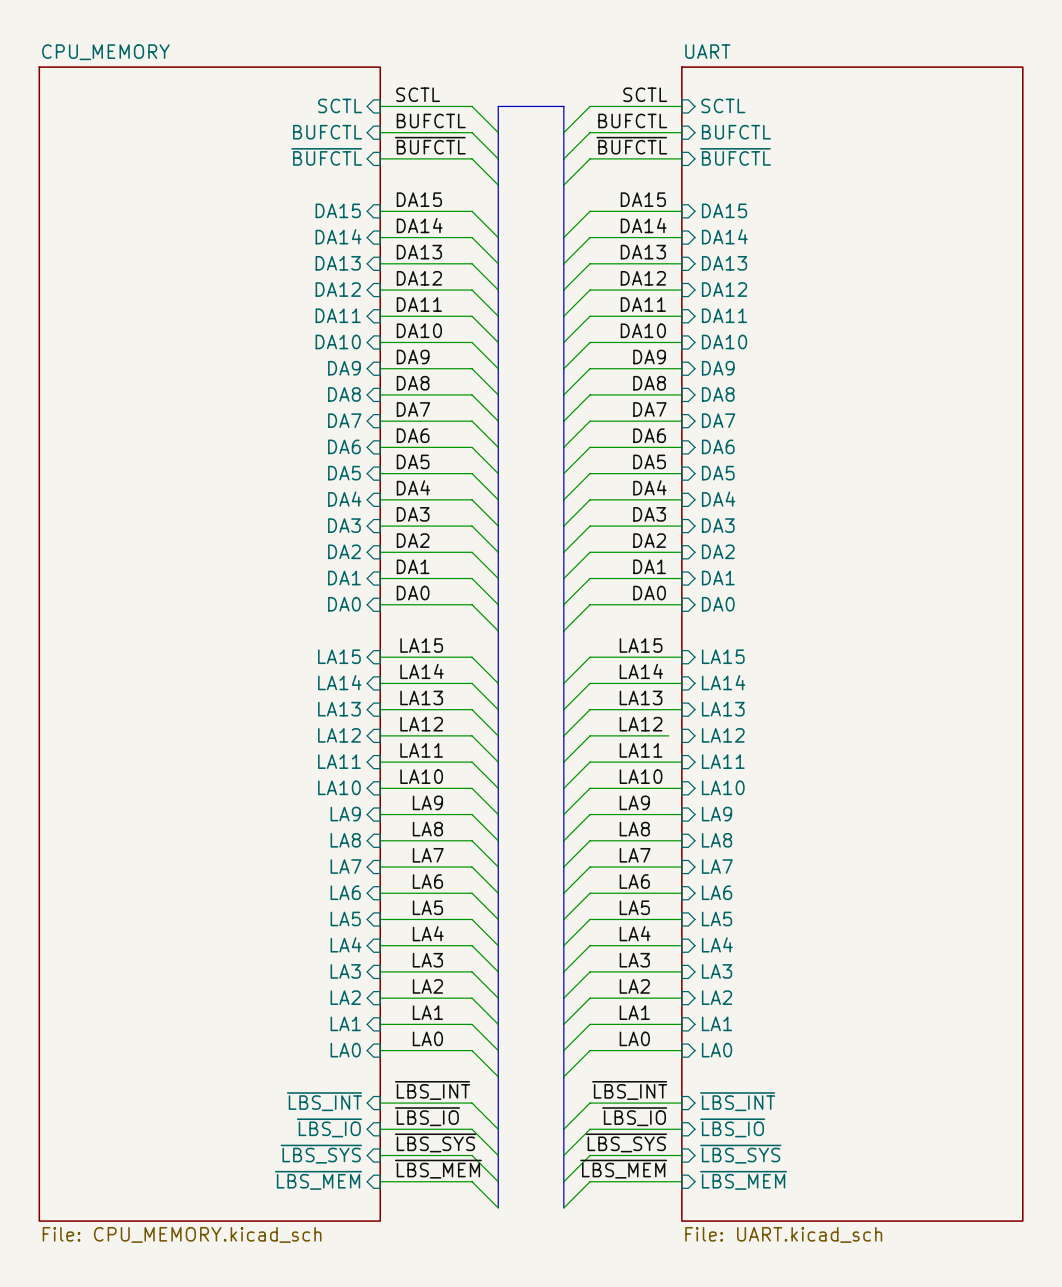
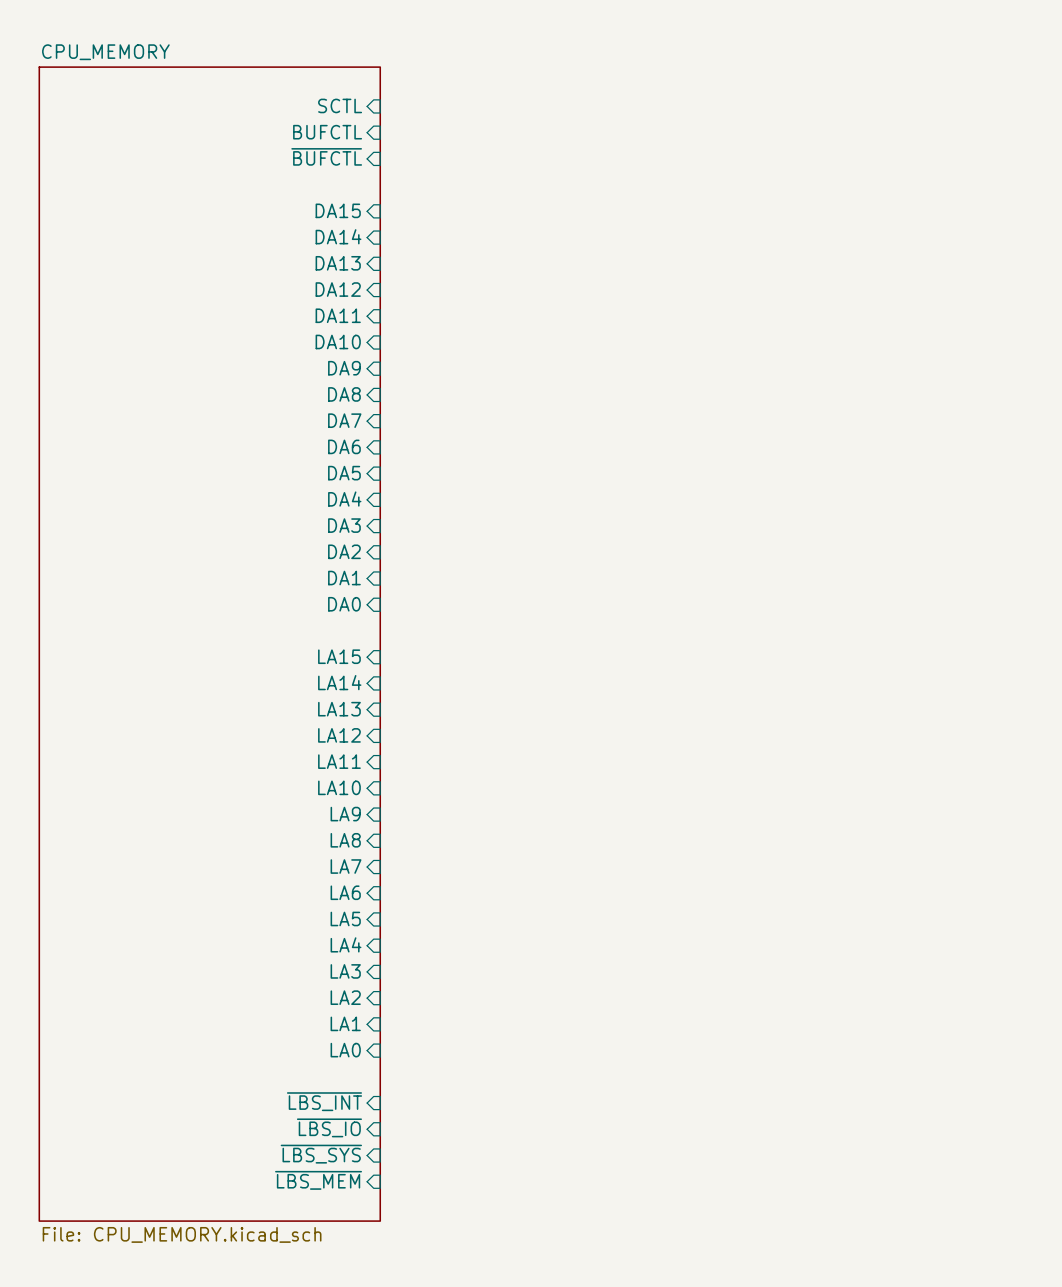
label: SCTL (418, 94) -> none
label: SCTL (645, 94) -> none
sheet pin: SCTL (723, 105) -> none
wire: (380, 106) (472, 106) (498, 132) -> none
wire: (681, 106) (590, 106) (563, 132) -> none
label: BUFCTL (431, 120) -> none
label: BUFCTL (632, 120) -> none
wire: (380, 132) (472, 132) (498, 158) -> none
wire: (681, 132) (590, 132) (563, 158) -> none
sheet pin: BUFCTL (736, 132) -> none
label: ~{BUFCTL} (430, 145) -> none
label: ~{BUFCTL} (631, 145) -> none
sheet pin: ~{BUFCTL} (735, 156) -> none
wire: (380, 158) (472, 158) (498, 185) -> none
wire: (681, 158) (590, 158) (563, 185) -> none
label: DA15 (419, 199) -> none
label: DA15 (643, 199) -> none
sheet pin: DA15 (724, 210) -> none
wire: (380, 211) (472, 211) (498, 237) -> none
wire: (681, 211) (590, 211) (563, 237) -> none
label: DA14 (419, 225) -> none
label: DA14 (643, 225) -> none
sheet pin: DA14 (724, 236) -> none
wire: (380, 237) (472, 237) (498, 263) -> none
wire: (681, 237) (590, 237) (563, 263) -> none
label: DA13 (419, 252) -> none
label: DA13 (643, 252) -> none
wire: (380, 263) (472, 263) (498, 290) -> none
wire: (681, 263) (590, 263) (563, 290) -> none
sheet pin: DA13 (724, 263) -> none
label: DA12 (419, 278) -> none
label: DA12 (643, 278) -> none
sheet pin: DA12 (724, 289) -> none
wire: (380, 290) (472, 290) (498, 316) -> none
wire: (681, 290) (590, 290) (563, 316) -> none
label: DA11 (419, 304) -> none
label: DA11 (643, 304) -> none
sheet pin: DA11 (724, 315) -> none
wire: (380, 316) (472, 316) (498, 342) -> none
wire: (681, 316) (590, 316) (563, 342) -> none
label: DA10 (419, 330) -> none
label: DA10 (643, 330) -> none
sheet pin: DA10 (724, 341) -> none
wire: (380, 342) (472, 342) (498, 368) -> none
wire: (681, 342) (590, 342) (563, 368) -> none
label: DA9 (413, 357) -> none
label: DA9 (649, 357) -> none
wire: (380, 368) (472, 368) (498, 394) -> none
wire: (681, 368) (590, 368) (563, 394) -> none
sheet pin: DA9 (718, 368) -> none
label: DA8 (413, 383) -> none
label: DA8 (649, 383) -> none
wire: (380, 394) (472, 394) (498, 421) -> none
wire: (681, 394) (590, 394) (563, 421) -> none
sheet pin: DA8 (718, 394) -> none
label: DA7 (413, 409) -> none
label: DA7 (649, 409) -> none
sheet pin: DA7 (718, 420) -> none
wire: (380, 421) (472, 421) (498, 447) -> none
wire: (681, 421) (590, 421) (563, 447) -> none
label: DA6 (413, 435) -> none
label: DA6 (649, 435) -> none
sheet pin: DA6 (718, 446) -> none
wire: (380, 447) (472, 447) (498, 473) -> none
wire: (681, 447) (590, 447) (563, 473) -> none
label: DA5 (413, 461) -> none
label: DA5 (649, 461) -> none
wire: (380, 473) (472, 473) (498, 499) -> none
wire: (681, 473) (590, 473) (563, 499) -> none
sheet pin: DA5 (718, 473) -> none
label: DA4 (413, 487) -> none
label: DA4 (649, 487) -> none
wire: (380, 499) (472, 499) (498, 526) -> none
wire: (681, 499) (590, 499) (563, 526) -> none
sheet pin: DA4 (718, 499) -> none
label: DA3 (413, 514) -> none
label: DA3 (649, 514) -> none
sheet pin: DA3 (718, 525) -> none
wire: (380, 526) (472, 526) (498, 552) -> none
wire: (681, 526) (590, 526) (563, 552) -> none
label: DA2 (413, 540) -> none
label: DA2 (649, 540) -> none
sheet pin: DA2 (718, 551) -> none
wire: (380, 552) (472, 552) (498, 578) -> none
wire: (681, 552) (590, 552) (563, 578) -> none
label: DA1 (413, 566) -> none
label: DA1 (649, 566) -> none
wire: (380, 578) (472, 578) (498, 604) -> none
wire: (681, 578) (590, 578) (563, 604) -> none
sheet pin: DA1 (718, 578) -> none
label: DA0 (413, 593) -> none
label: DA0 (649, 593) -> none
wire: (380, 604) (472, 604) (498, 630) -> none
wire: (681, 604) (590, 604) (563, 630) -> none
sheet pin: DA0 (718, 604) -> none
sheet UART: File: UART.kicad_sch (852, 644) -> none
label: LA15 (421, 645) -> none
label: LA15 (641, 645) -> none
sheet pin: LA15 (723, 656) -> none
wire: (380, 657) (472, 657) (498, 683) -> none
wire: (681, 657) (590, 657) (563, 683) -> none
label: LA14 (421, 671) -> none
label: LA14 (641, 671) -> none
sheet pin: LA14 (723, 682) -> none
wire: (380, 683) (472, 683) (498, 709) -> none
wire: (681, 683) (590, 683) (563, 709) -> none
label: LA13 (421, 697) -> none
label: LA13 (641, 697) -> none
wire: (380, 709) (472, 709) (498, 735) -> none
wire: (681, 709) (590, 709) (563, 735) -> none
sheet pin: LA13 (723, 709) -> none
label: LA12 (421, 724) -> none
label: LA12 (641, 724) -> none
wire: (380, 735) (472, 735) (498, 762) -> none
wire: (668, 735) (590, 735) (563, 762) -> none
sheet pin: LA12 (723, 735) -> none
label: LA11 (421, 750) -> none
label: LA11 (641, 750) -> none
sheet pin: LA11 (723, 761) -> none
wire: (380, 762) (472, 762) (498, 788) -> none
wire: (681, 762) (590, 762) (563, 788) -> none
label: LA10 (421, 776) -> none
label: LA10 (641, 776) -> none
sheet pin: LA10 (723, 787) -> none
wire: (380, 788) (472, 788) (498, 814) -> none
wire: (681, 788) (590, 788) (563, 814) -> none
label: LA9 (427, 802) -> none
label: LA9 (634, 802) -> none
wire: (380, 814) (472, 814) (498, 840) -> none
wire: (681, 814) (590, 814) (563, 840) -> none
sheet pin: LA9 (717, 814) -> none
label: LA8 (427, 829) -> none
label: LA8 (634, 829) -> none
wire: (380, 840) (472, 840) (498, 867) -> none
wire: (681, 840) (590, 840) (563, 867) -> none
sheet pin: LA8 (717, 840) -> none
label: LA7 (428, 855) -> none
label: LA7 (635, 855) -> none
sheet pin: LA7 (717, 866) -> none
wire: (380, 867) (472, 867) (498, 893) -> none
wire: (681, 867) (590, 867) (563, 893) -> none
label: LA6 (427, 881) -> none
label: LA6 (634, 881) -> none
sheet pin: LA6 (717, 892) -> none
wire: (380, 893) (472, 893) (498, 919) -> none
wire: (681, 893) (590, 893) (563, 919) -> none
label: LA5 (427, 907) -> none
label: LA5 (634, 907) -> none
sheet pin: LA5 (717, 918) -> none
wire: (380, 919) (472, 919) (498, 945) -> none
wire: (681, 919) (590, 919) (563, 945) -> none
label: LA4 (428, 933) -> none
label: LA4 (635, 933) -> none
sheet pin: LA4 (717, 944) -> none
wire: (380, 945) (472, 945) (498, 971) -> none
wire: (681, 945) (590, 945) (563, 971) -> none
label: LA3 (427, 960) -> none
label: LA3 (634, 960) -> none
wire: (380, 971) (472, 971) (498, 998) -> none
wire: (681, 971) (590, 971) (563, 998) -> none
sheet pin: LA3 (717, 971) -> none
label: LA2 (427, 986) -> none
label: LA2 (634, 986) -> none
sheet pin: LA2 (717, 997) -> none
wire: (380, 998) (472, 998) (498, 1024) -> none
wire: (681, 998) (590, 998) (563, 1024) -> none
label: LA1 (427, 1012) -> none
label: LA1 (634, 1012) -> none
sheet pin: LA1 (717, 1023) -> none
wire: (380, 1024) (472, 1024) (498, 1050) -> none
wire: (681, 1024) (590, 1024) (563, 1050) -> none
label: LA0 (427, 1038) -> none
label: LA0 (634, 1038) -> none
wire: (380, 1050) (472, 1050) (498, 1076) -> none
wire: (681, 1050) (590, 1050) (563, 1076) -> none
sheet pin: LA0 (717, 1050) -> none
label: ~{LBS_INT} (432, 1090) -> none
label: ~{LBS_INT} (629, 1090) -> none
sheet pin: ~{LBS_INT} (737, 1101) -> none
wire: (380, 1103) (472, 1103) (498, 1129) -> none
wire: (681, 1103) (590, 1103) (563, 1129) -> none
label: ~{LBS_IO} (427, 1116) -> none
label: ~{LBS_IO} (634, 1116) -> none
sheet pin: ~{LBS_IO} (732, 1127) -> none
wire: (380, 1129) (472, 1129) (498, 1155) -> none
wire: (681, 1129) (590, 1129) (563, 1155) -> none
label: ~{LBS_SYS} (435, 1142) -> none
label: ~{LBS_SYS} (626, 1142) -> none
sheet pin: ~{LBS_SYS} (740, 1154) -> none
wire: (380, 1155) (472, 1155) (498, 1181) -> none
wire: (681, 1155) (590, 1155) (563, 1181) -> none
label: ~{LBS_MEM} (438, 1169) -> none
label: ~{LBS_MEM} (623, 1169) -> none
sheet pin: ~{LBS_MEM} (743, 1180) -> none
wire: (380, 1181) (472, 1181) (498, 1207) -> none
wire: (681, 1181) (590, 1181) (563, 1207) -> none
bus: (498, 1207) (498, 106) (563, 106) (563, 1207) -> none

